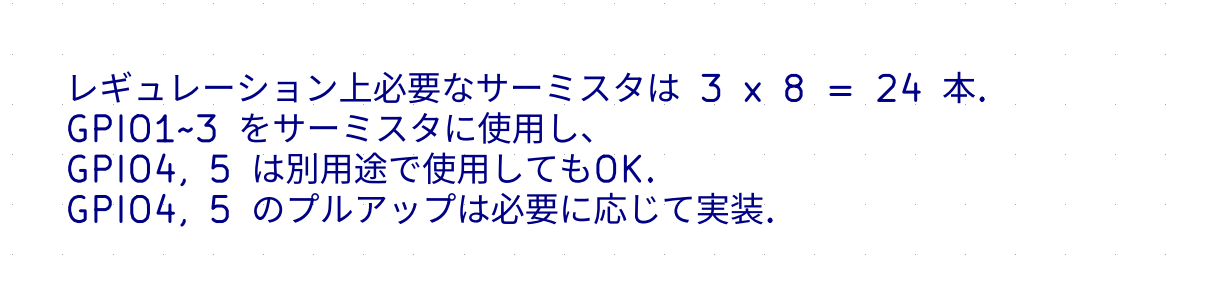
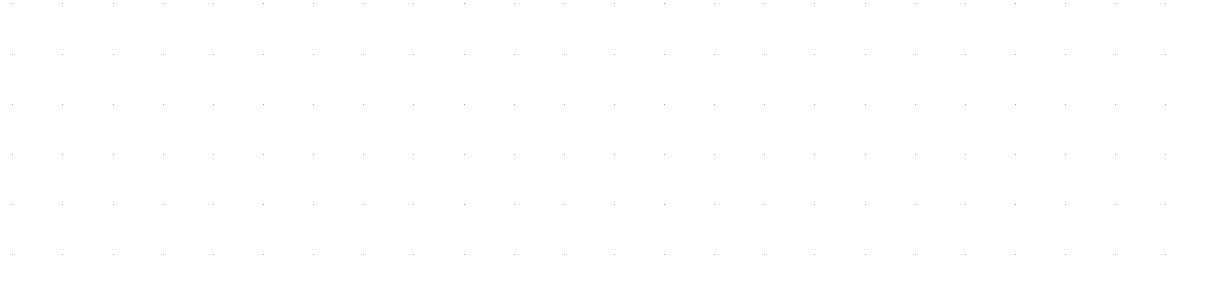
text: レギュレーション上必要なサーミスタは 3 x 8 = 24 本. (527, 87) -> none
text: GPIO1~3 をサーミスタに使用し、 (330, 127) -> none
text: GPIO4, 5 は別用途で使用してもOK. (360, 168) -> none
text: GPIO4, 5 のプルアップは必要に応じて実装. (420, 208) -> none

